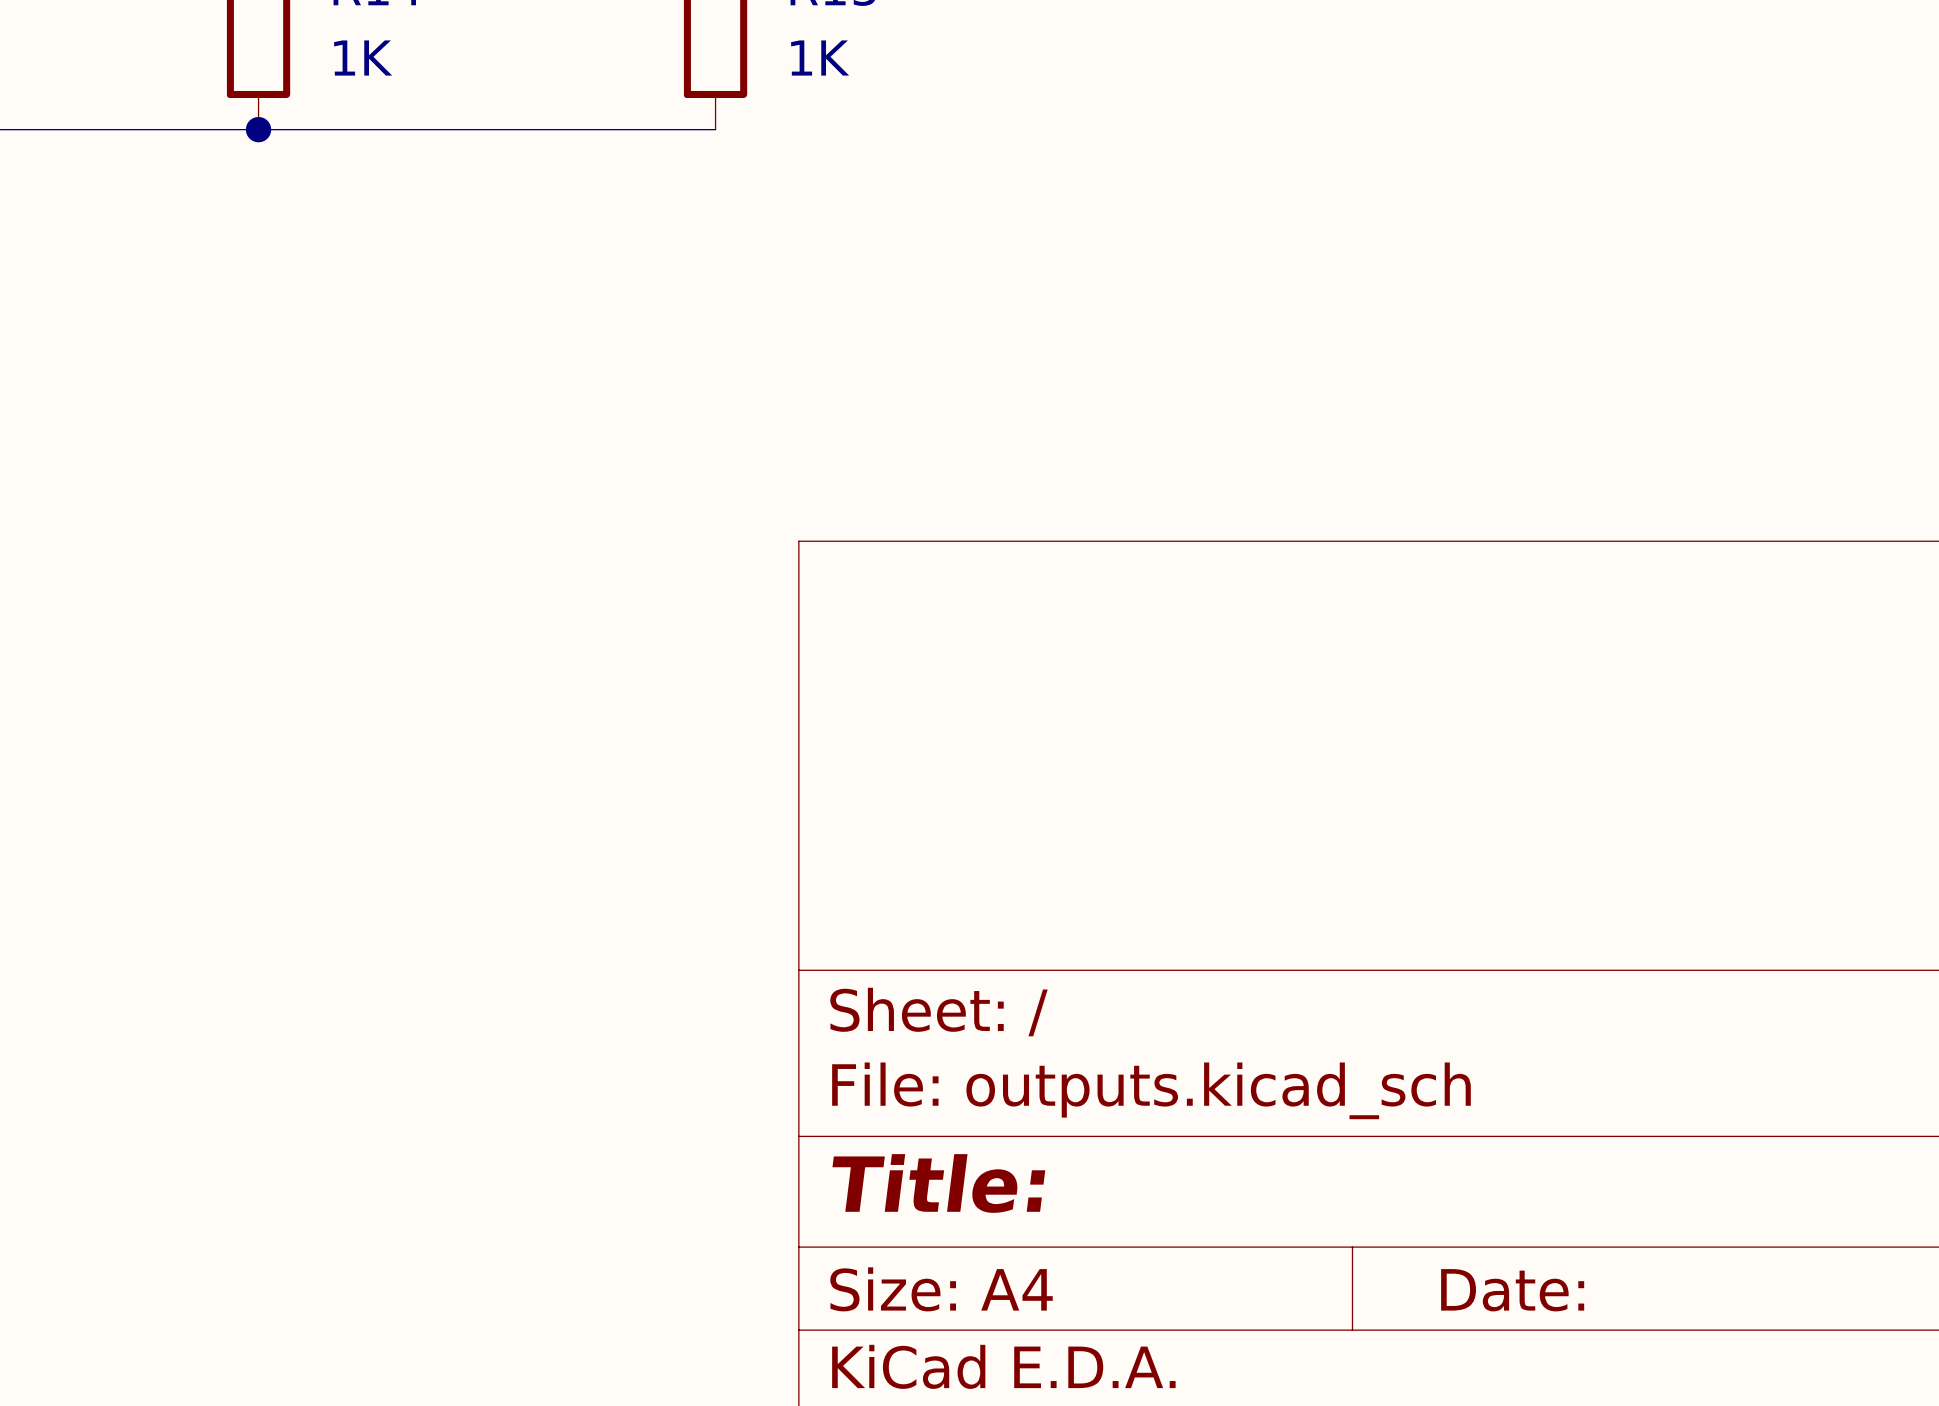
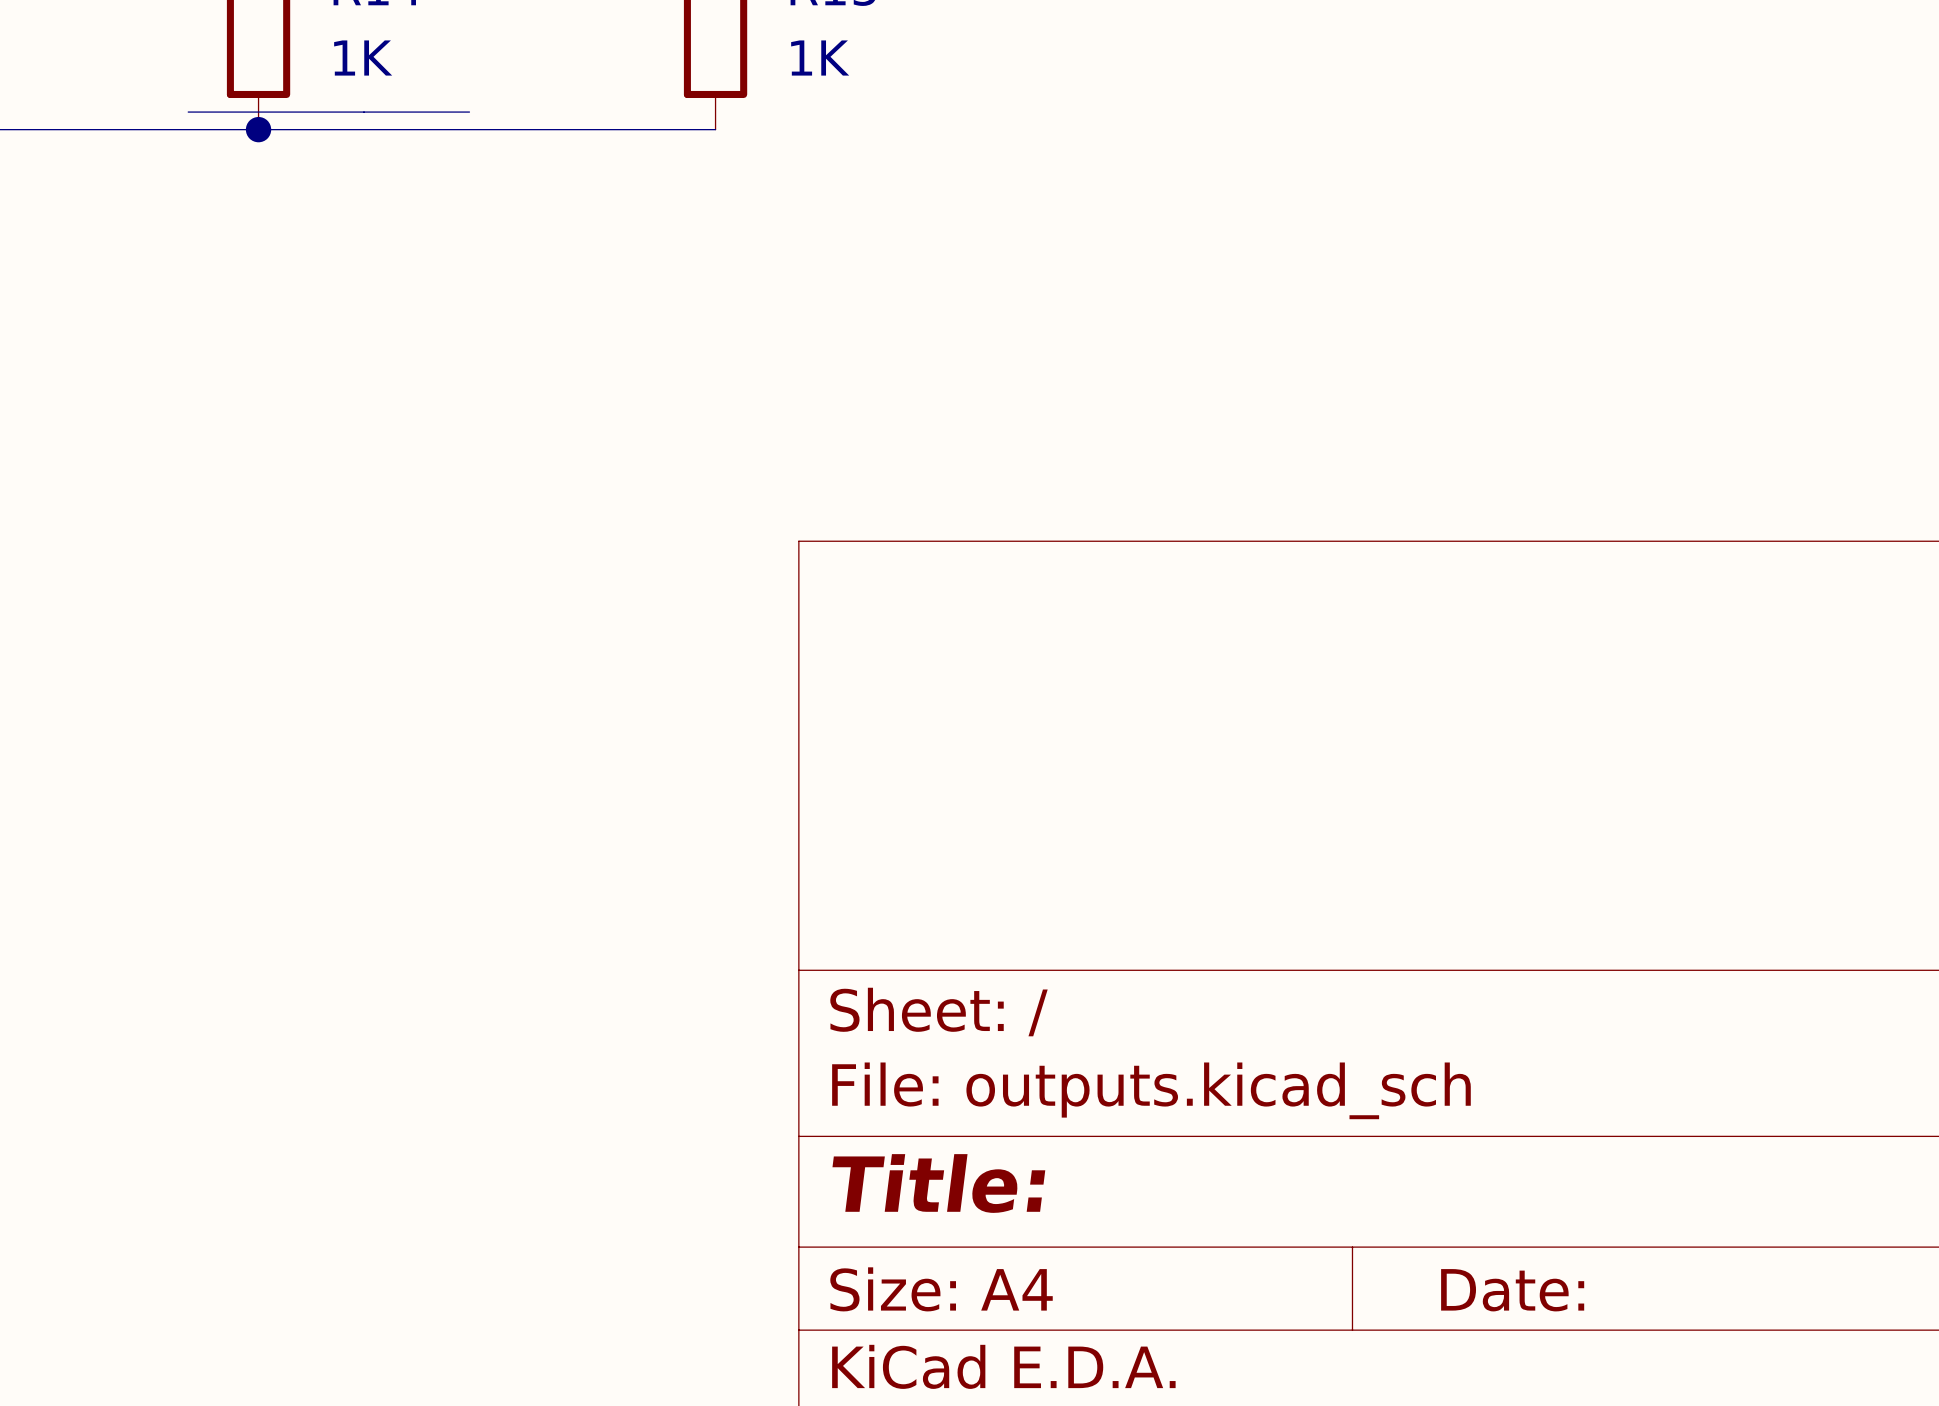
wire: none -> (188, 112) (469, 112)

